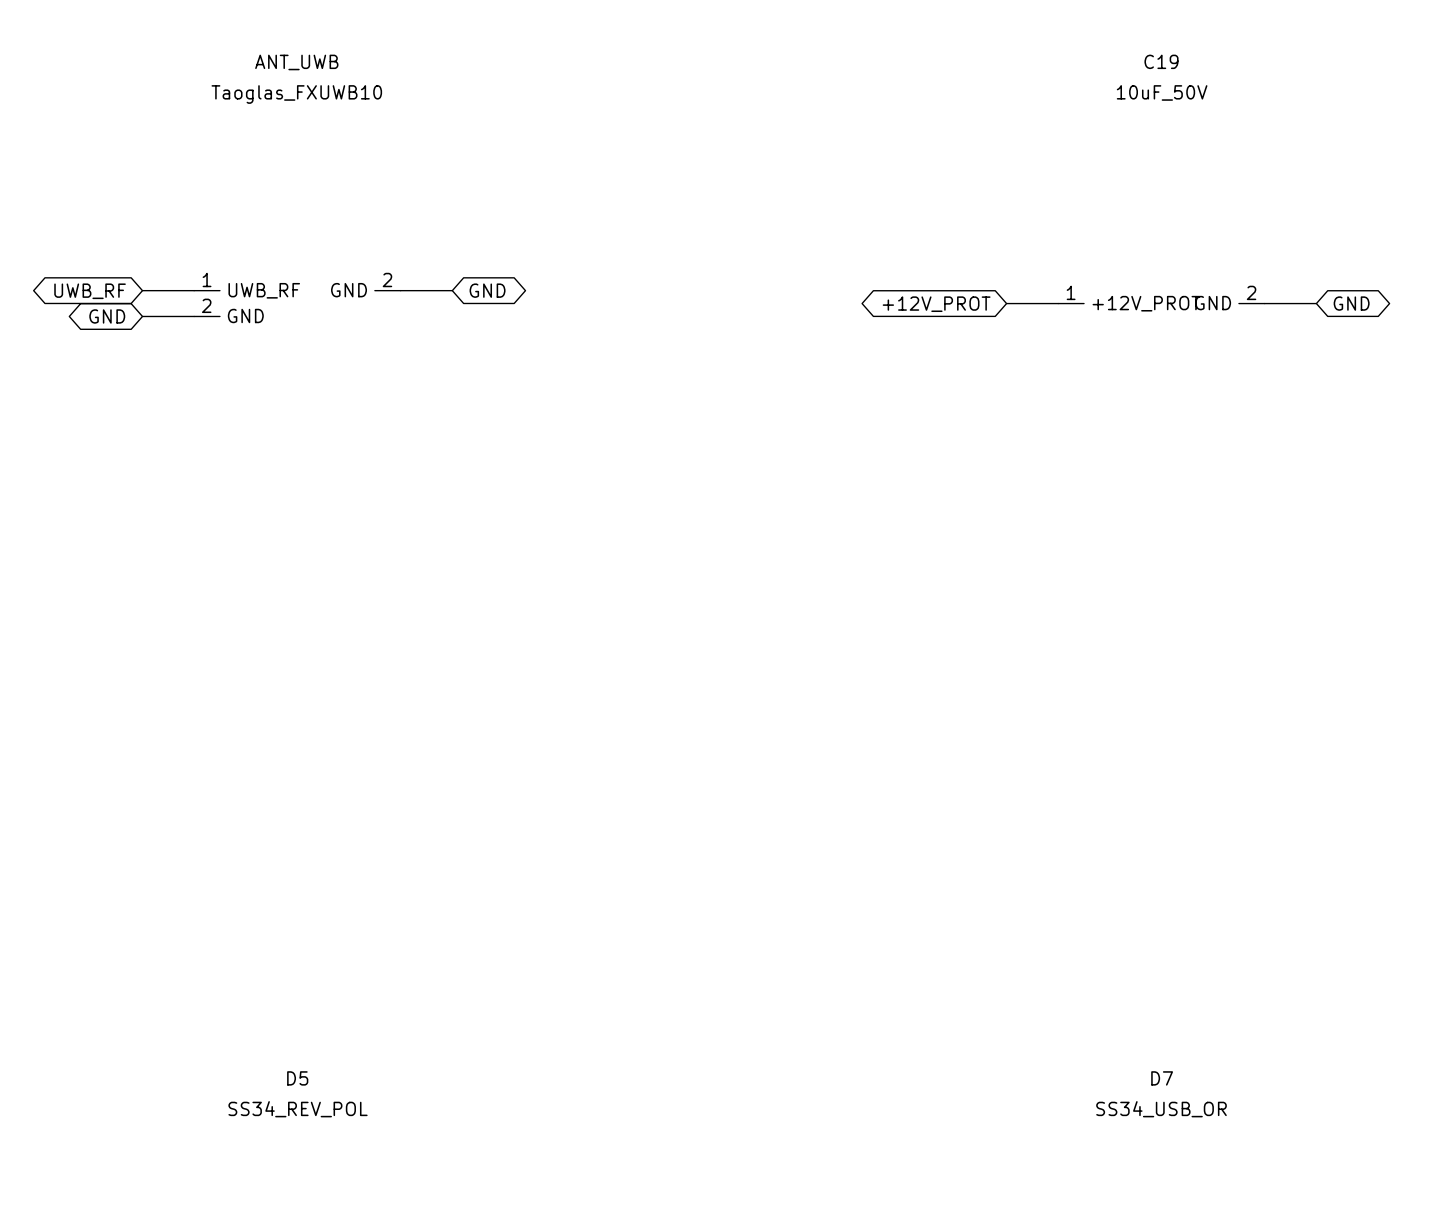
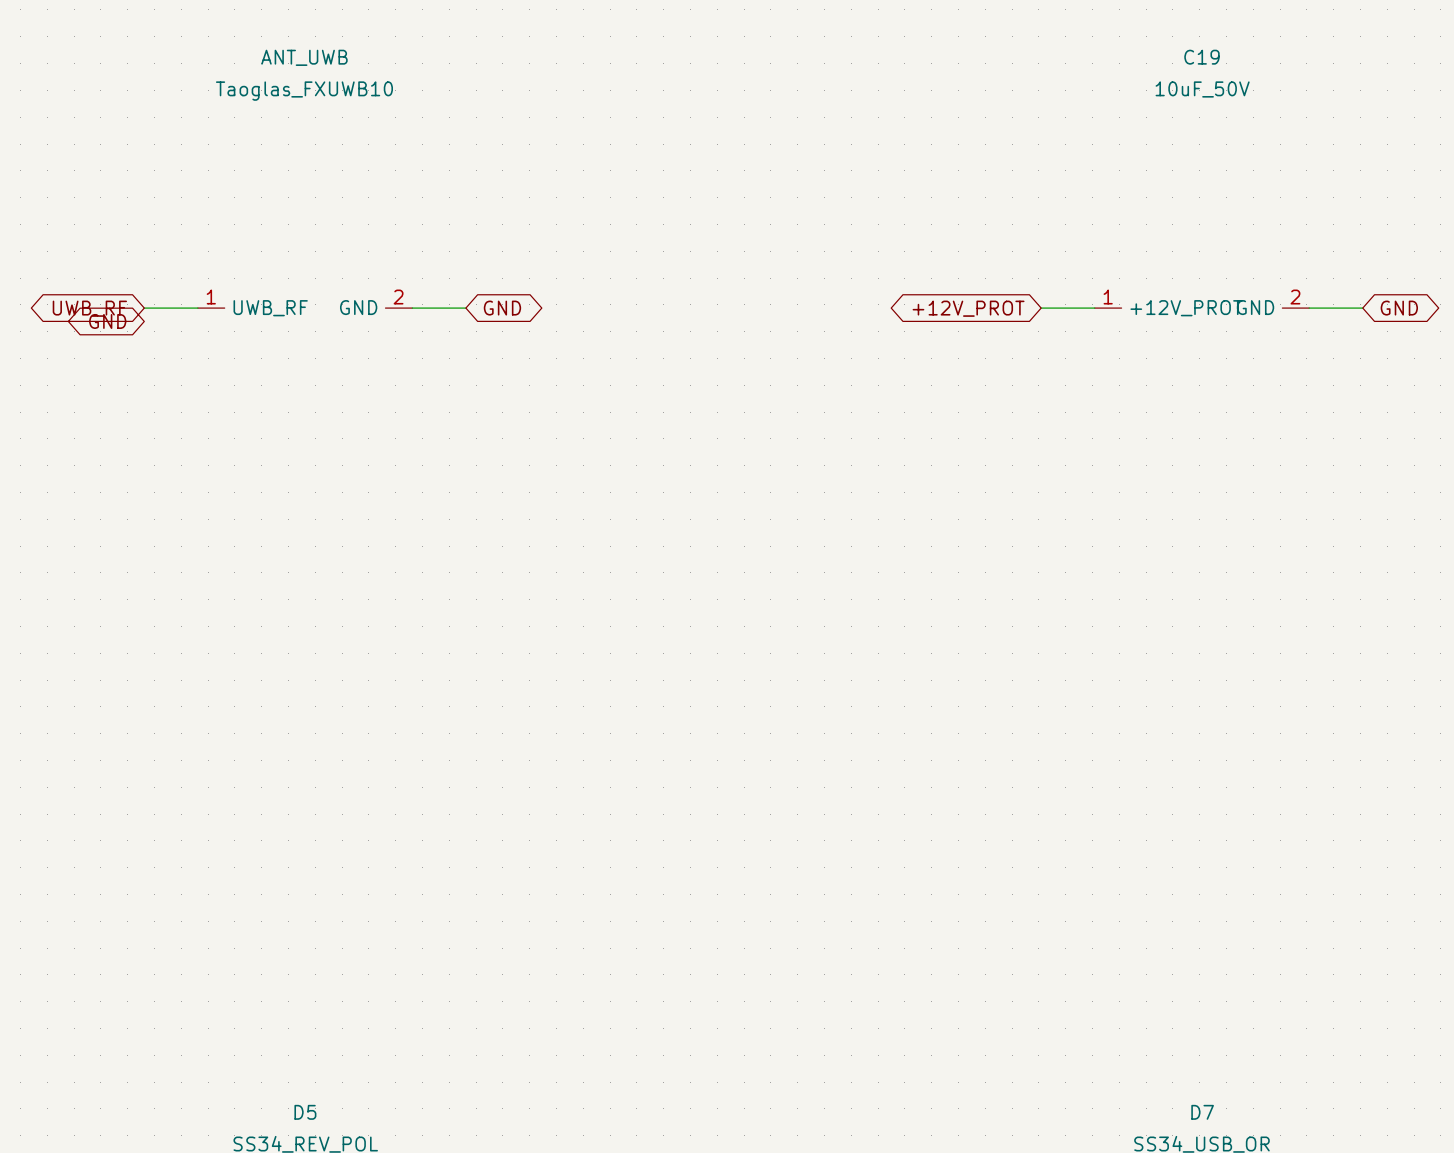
wire: (142, 290) (194, 290) -> (144, 308) (197, 308)
ANT_UWB symbol: [194, 290, 401, 317] -> [197, 308, 413, 309]
wire: (400, 290) (452, 290) -> (412, 308) (465, 308)
global label position: GND (487, 290) -> GND (502, 308)
global label position: UWB_RF (90, 291) -> UWB_RF (89, 308)
wire: (142, 316) (194, 316) -> none

